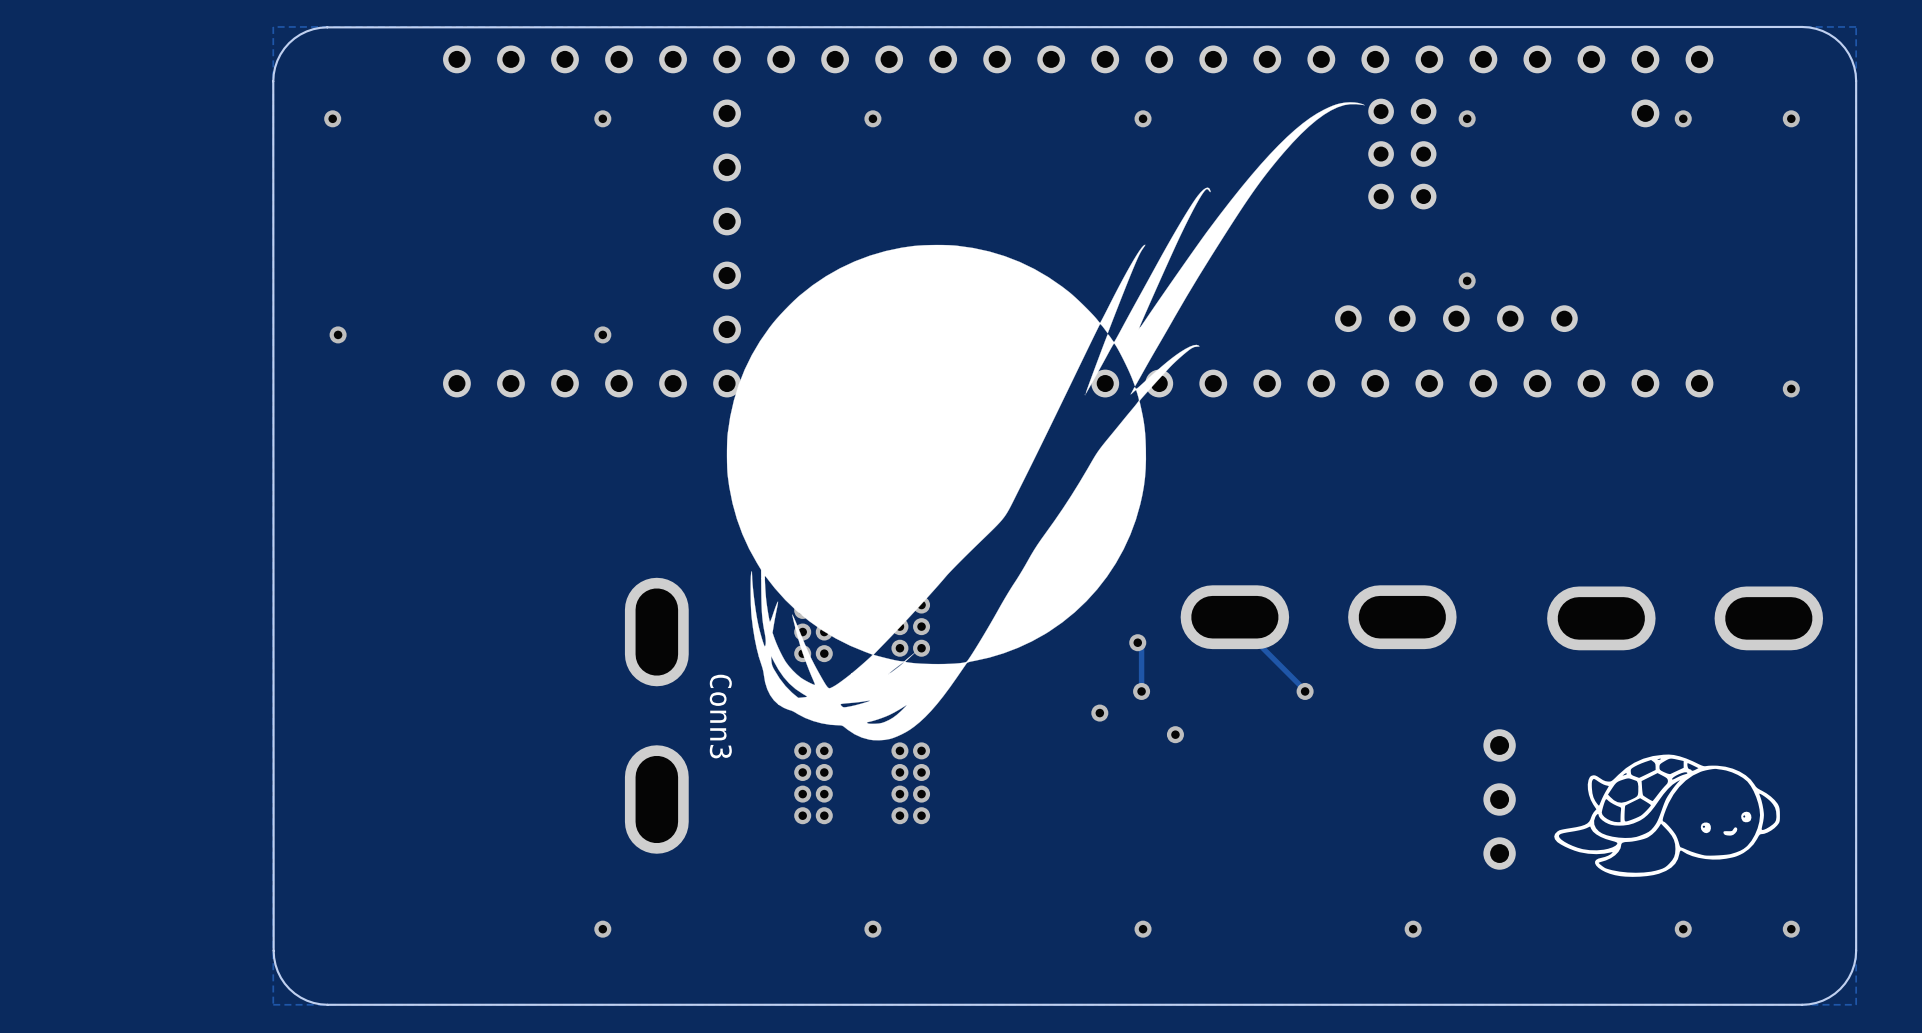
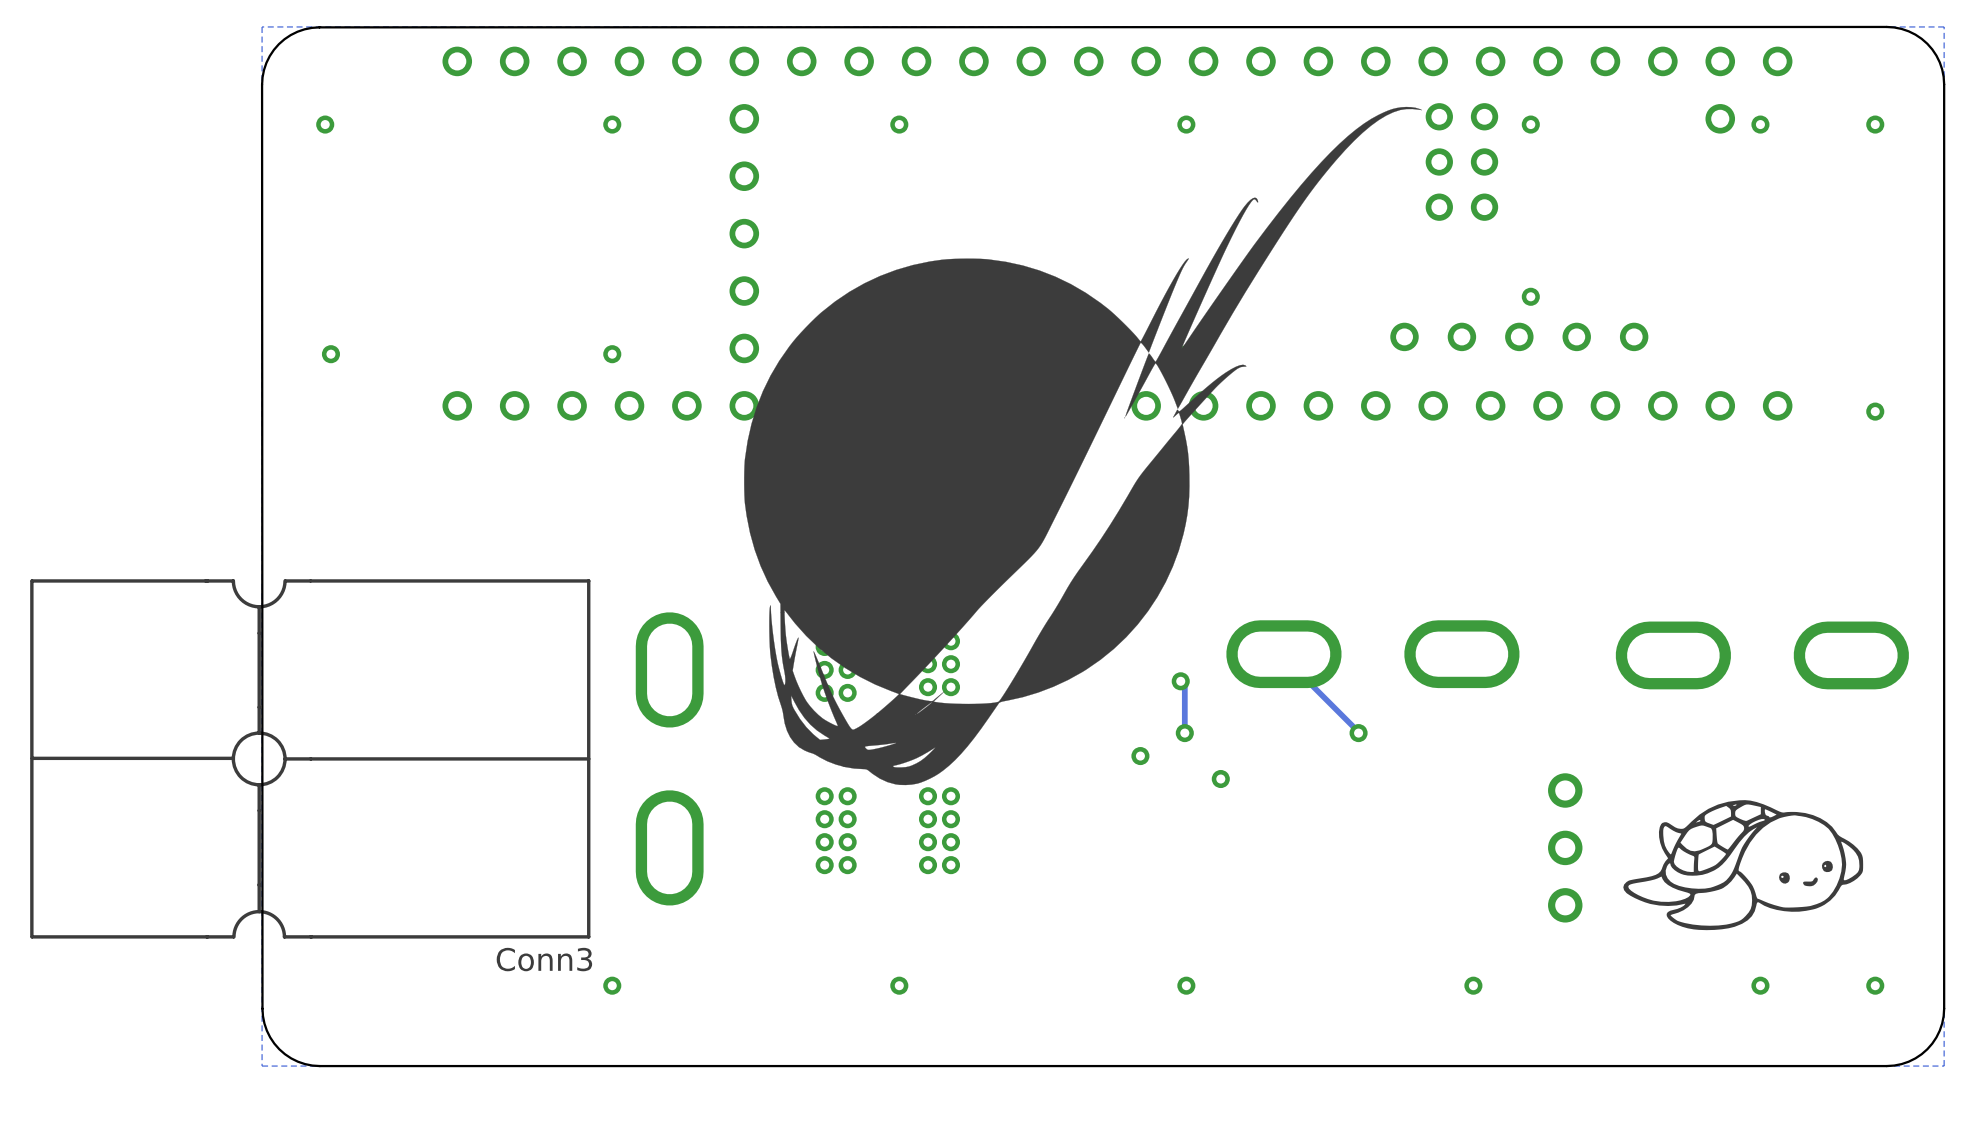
Conn3 footprint: [624, 577, 689, 854] -> [30, 579, 704, 939]
Conn3 name position: Conn3 (720, 716) -> Conn3 (544, 959)

